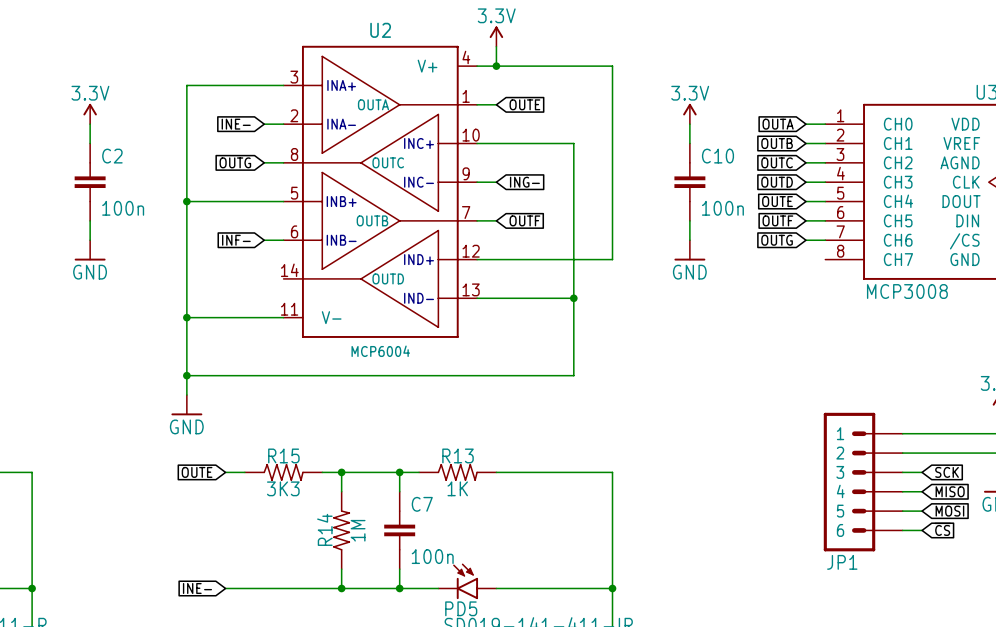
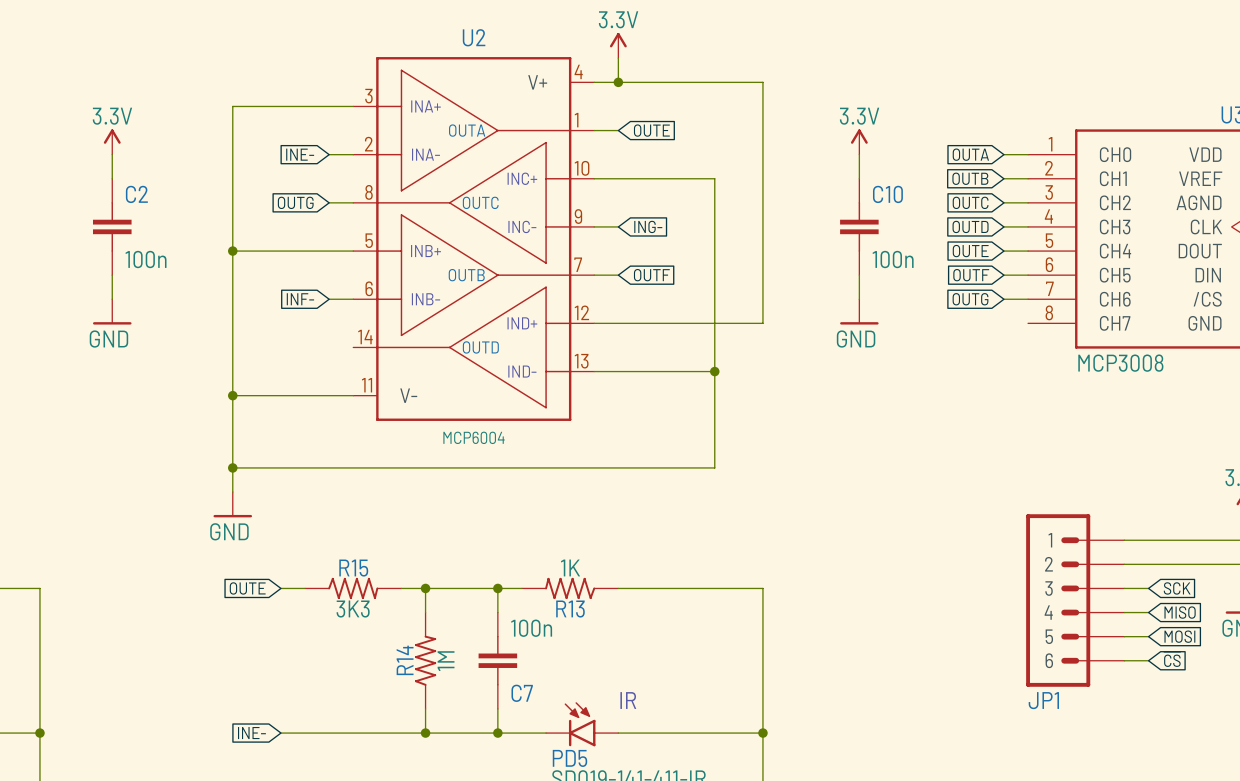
R13 rotation: 0° (457, 472) -> 180° (570, 588)
C7 name position: C7 (422, 504) -> C7 (522, 693)
C7 value position: 100n (432, 556) -> 100n (531, 628)
text: none -> IR (628, 700)

